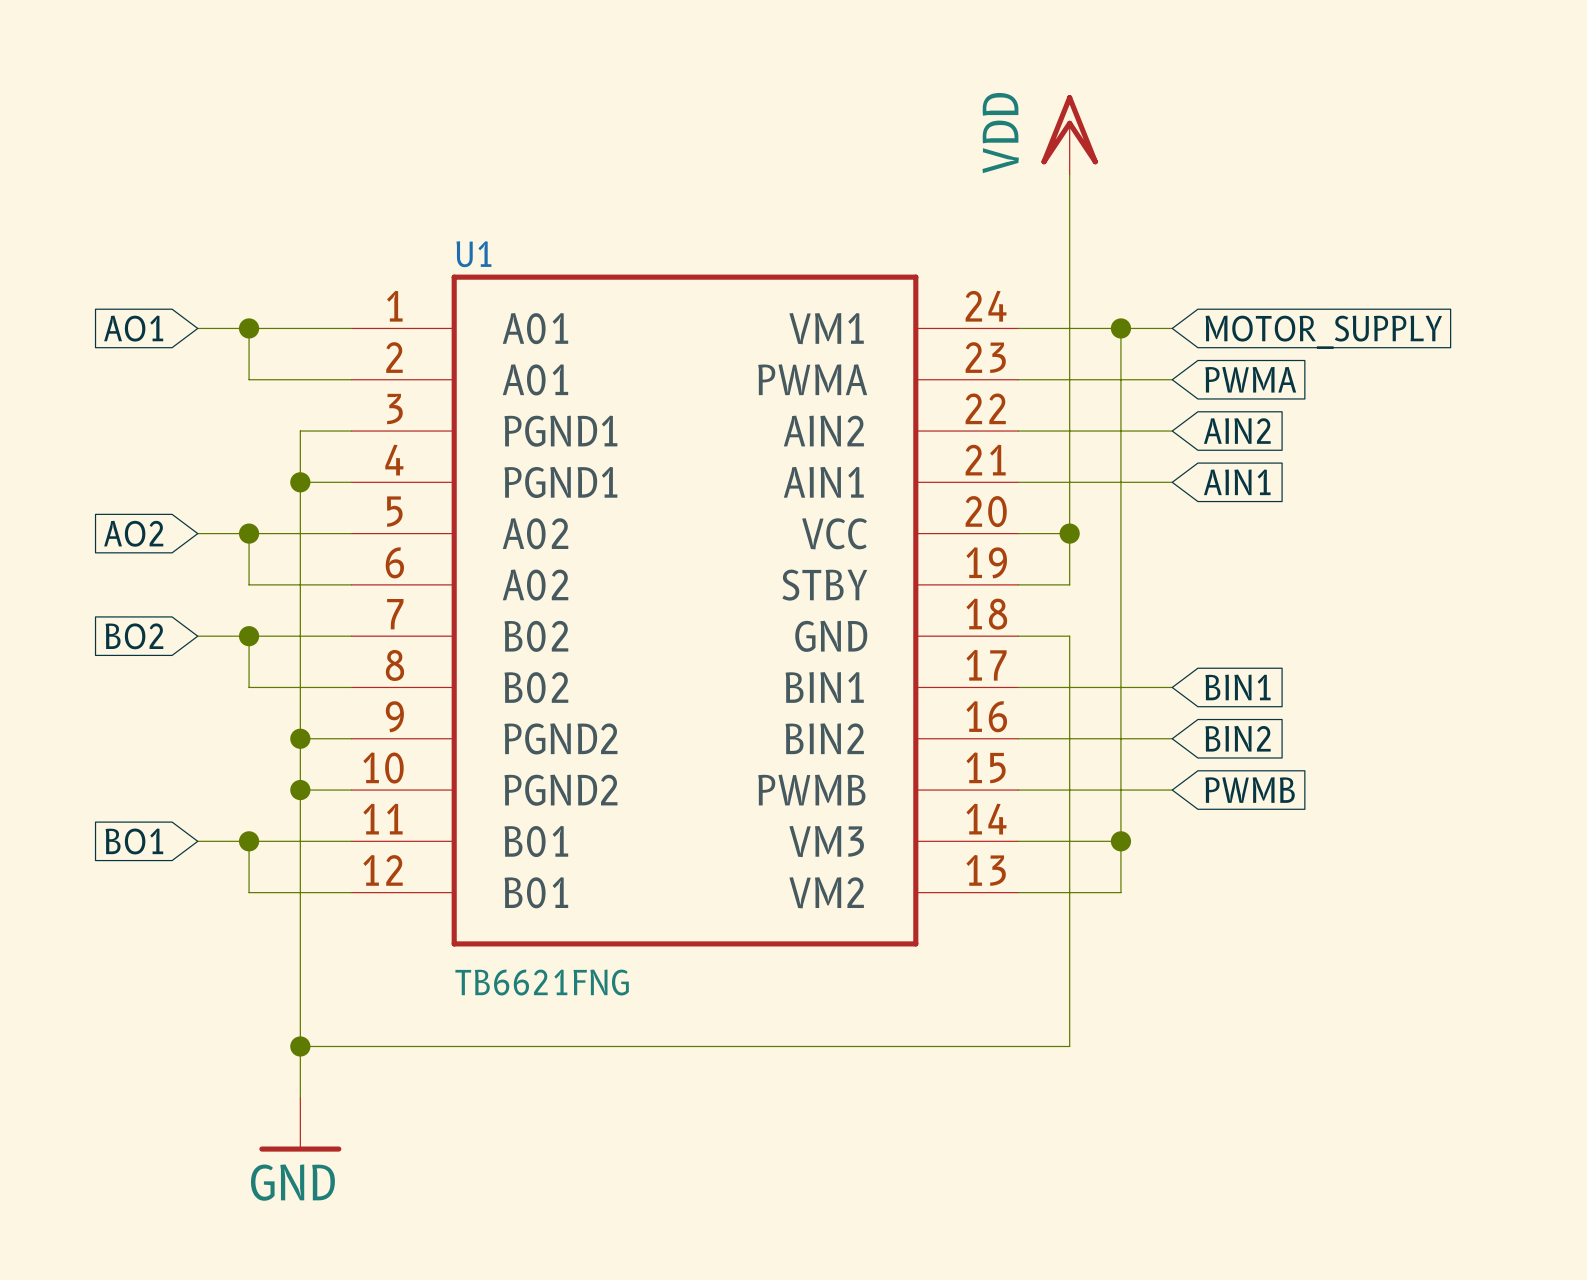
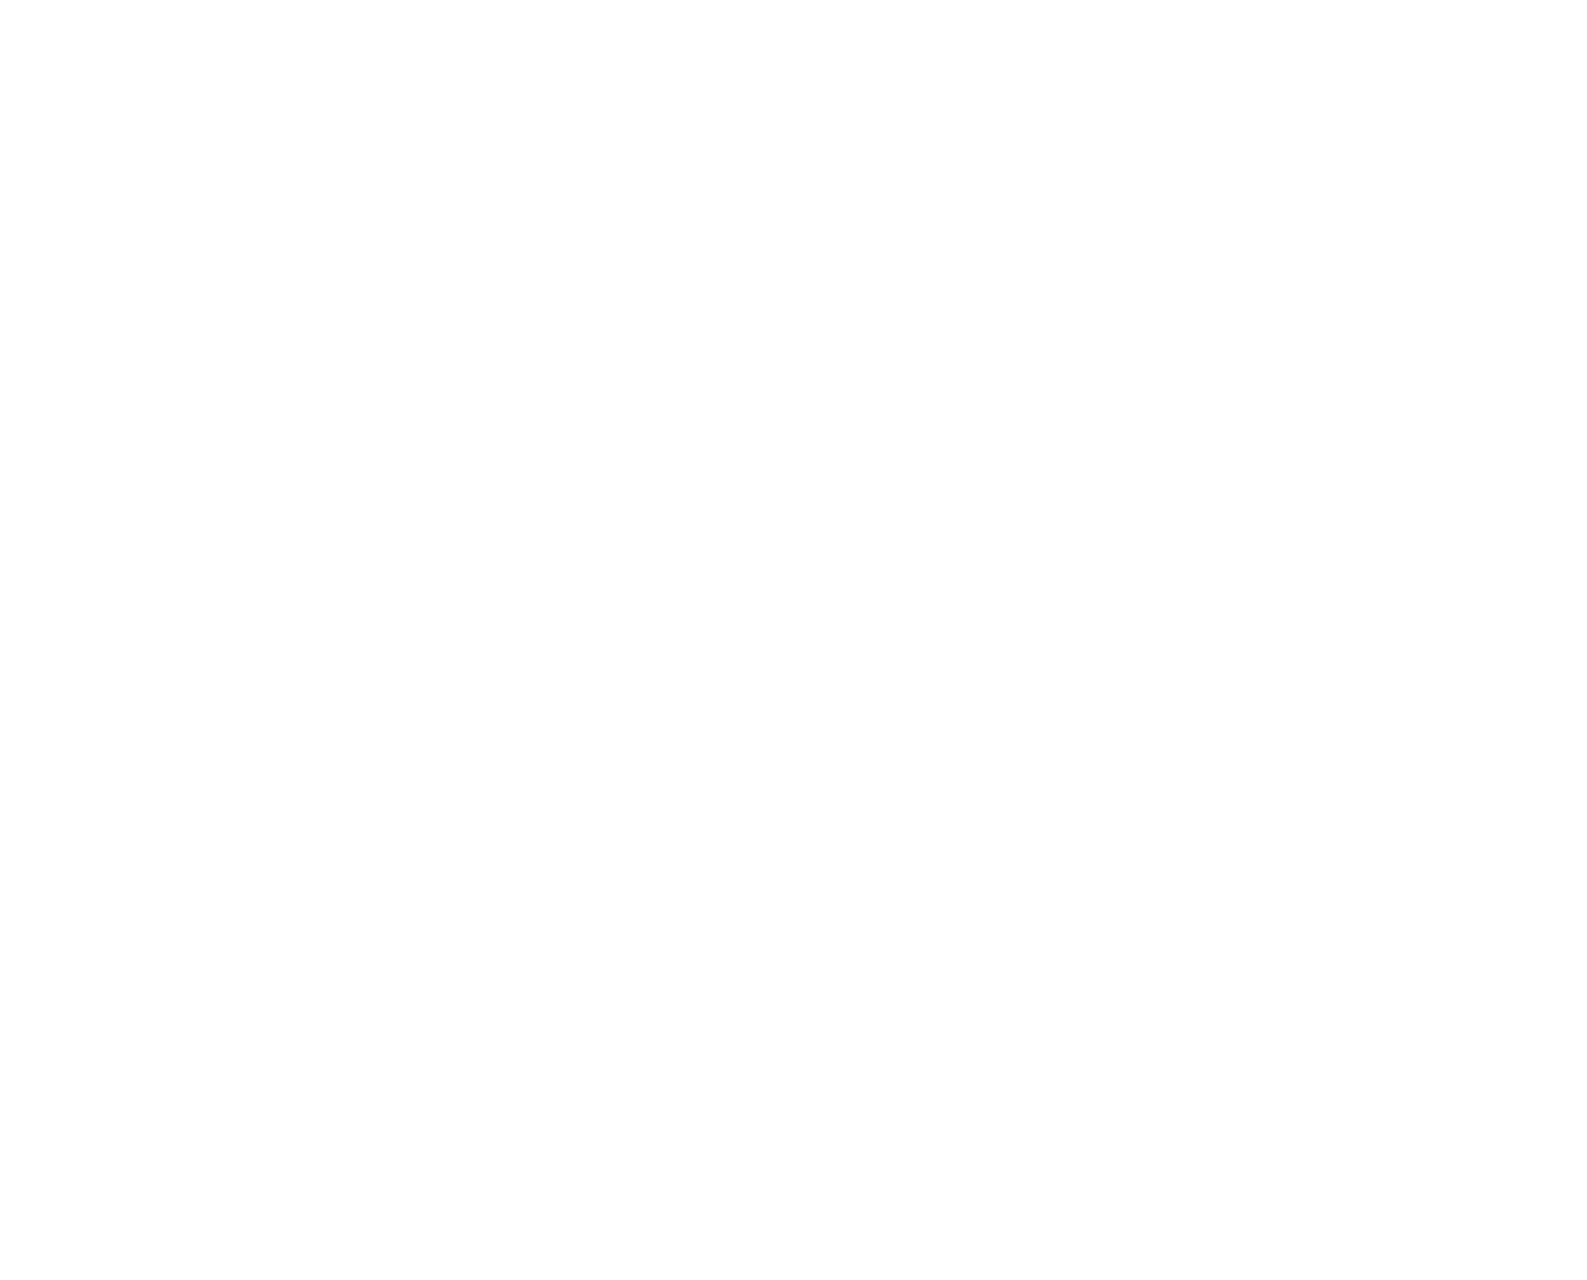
power symbol: VDD (1069, 134) -> none
wire: (1069, 174) (1069, 584) (1018, 584) -> none
global label: AO1 (133, 328) -> none
wire: (197, 328) (351, 328) -> none
wire: (249, 328) (249, 379) (351, 379) -> none
junction: (249, 328) -> none
wire: (1018, 328) (1172, 328) -> none
wire: (1120, 328) (1120, 892) (1018, 892) -> none
junction: (1120, 328) -> none
global label: MOTOR_SUPPLY (1323, 332) -> none
wire: (1018, 379) (1172, 379) -> none
global label: PWMA (1250, 379) -> none
wire: (351, 431) (300, 431) (300, 1097) -> none
wire: (1018, 431) (1172, 431) -> none
global label: AIN2 (1237, 431) -> none
wire: (300, 482) (351, 482) -> none
junction: (300, 482) -> none
wire: (1018, 482) (1172, 482) -> none
global label: AIN1 (1237, 482) -> none
global label: AO2 (133, 533) -> none
wire: (197, 533) (351, 533) -> none
wire: (249, 533) (249, 584) (351, 584) -> none
junction: (249, 533) -> none
wire: (1018, 533) (1069, 533) -> none
junction: (1069, 533) -> none
U1: TB6621FNG (685, 610) -> none
global label: BO2 (134, 636) -> none
wire: (197, 636) (351, 636) -> none
wire: (249, 636) (249, 687) (351, 687) -> none
junction: (249, 636) -> none
wire: (1018, 636) (1069, 636) (1069, 1046) (300, 1046) -> none
wire: (1018, 687) (1172, 687) -> none
global label: BIN1 (1238, 687) -> none
wire: (300, 738) (351, 738) -> none
junction: (300, 738) -> none
wire: (1018, 738) (1172, 738) -> none
global label: BIN2 (1238, 738) -> none
wire: (300, 790) (351, 790) -> none
junction: (300, 790) -> none
wire: (1018, 790) (1172, 790) -> none
global label: PWMB (1250, 790) -> none
global label: BO1 (134, 841) -> none
wire: (197, 841) (351, 841) -> none
wire: (249, 841) (249, 892) (351, 892) -> none
junction: (249, 841) -> none
wire: (1018, 841) (1120, 841) -> none
junction: (1120, 841) -> none
junction: (300, 1046) -> none
power symbol: GND (300, 1124) -> none

